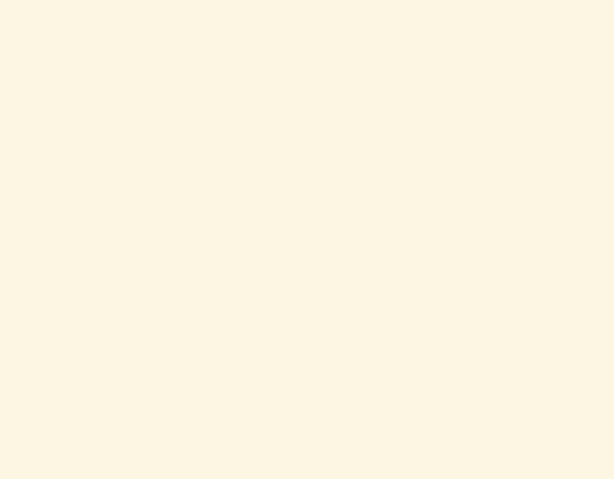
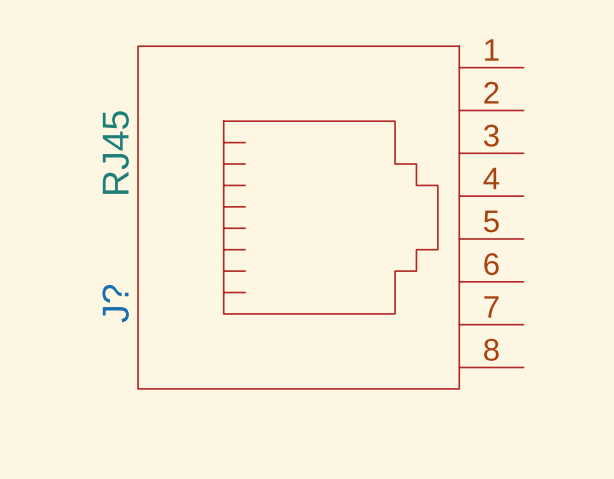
J?: none -> RJ45 (330, 217)

